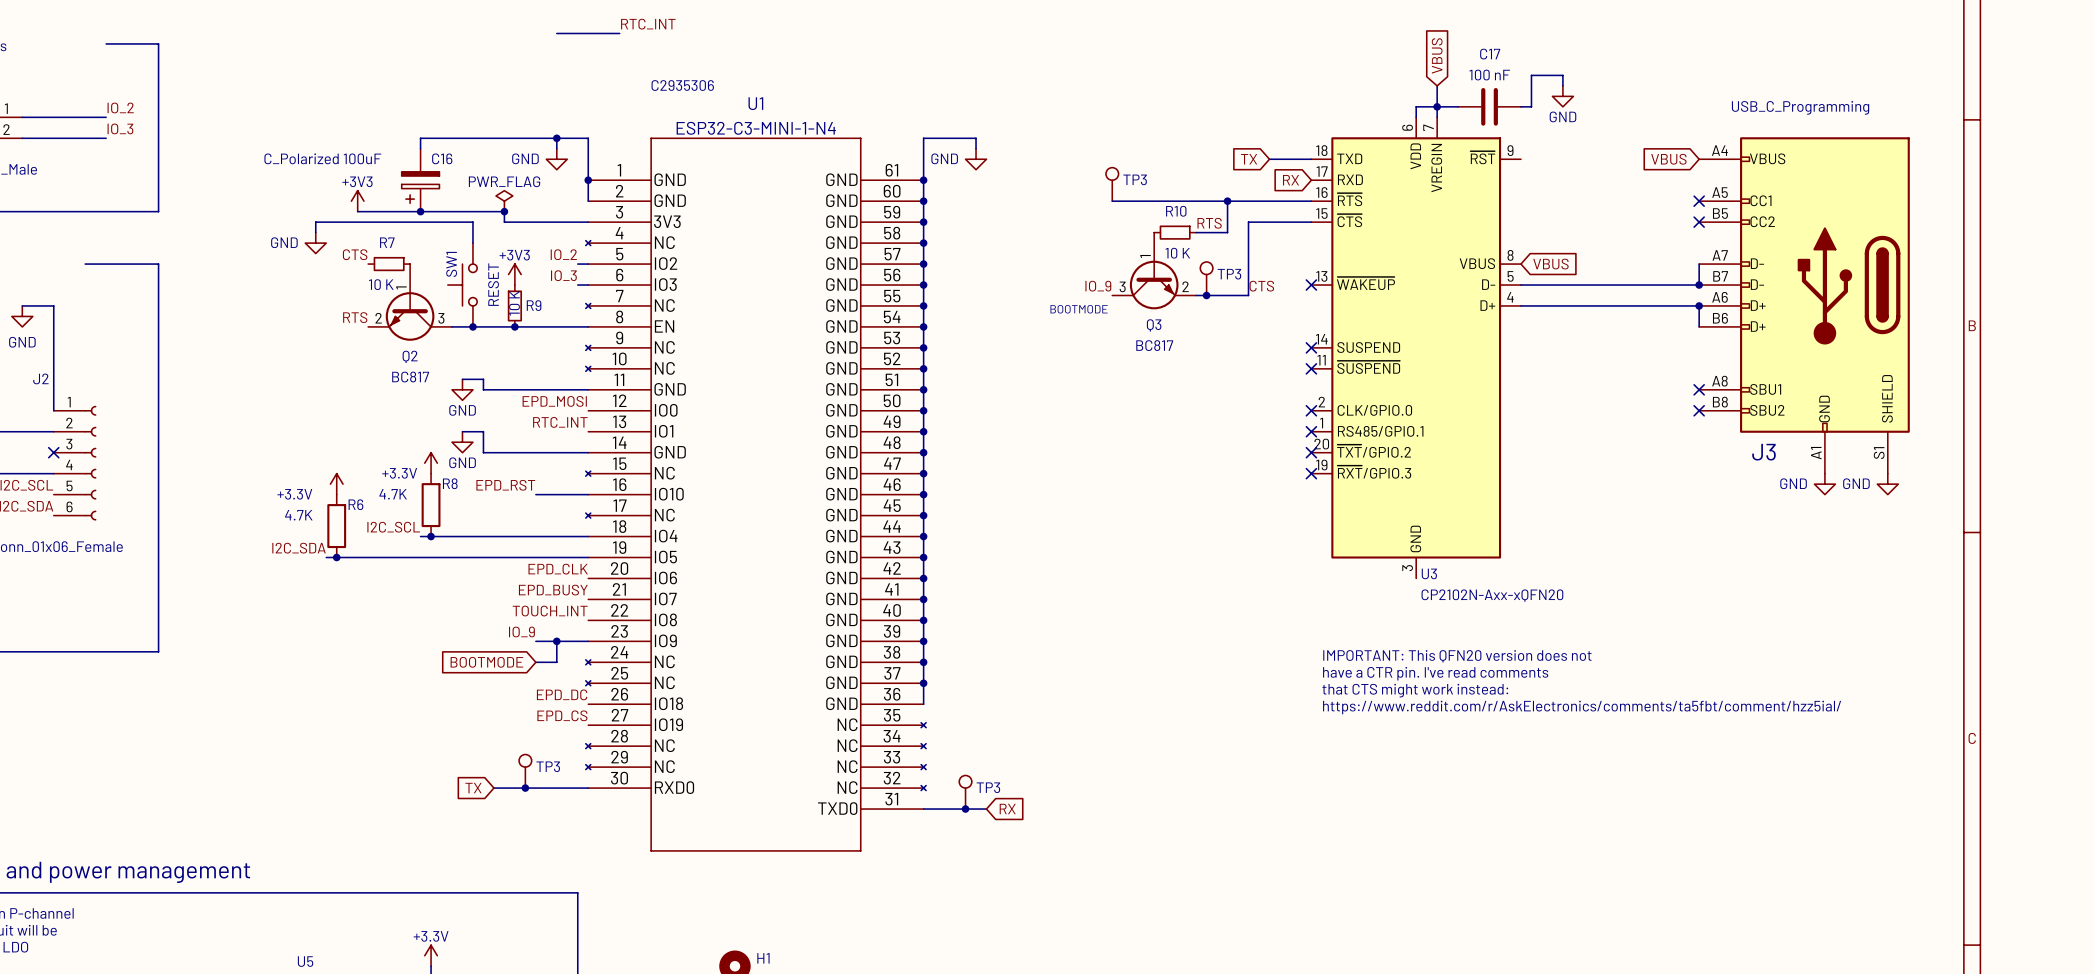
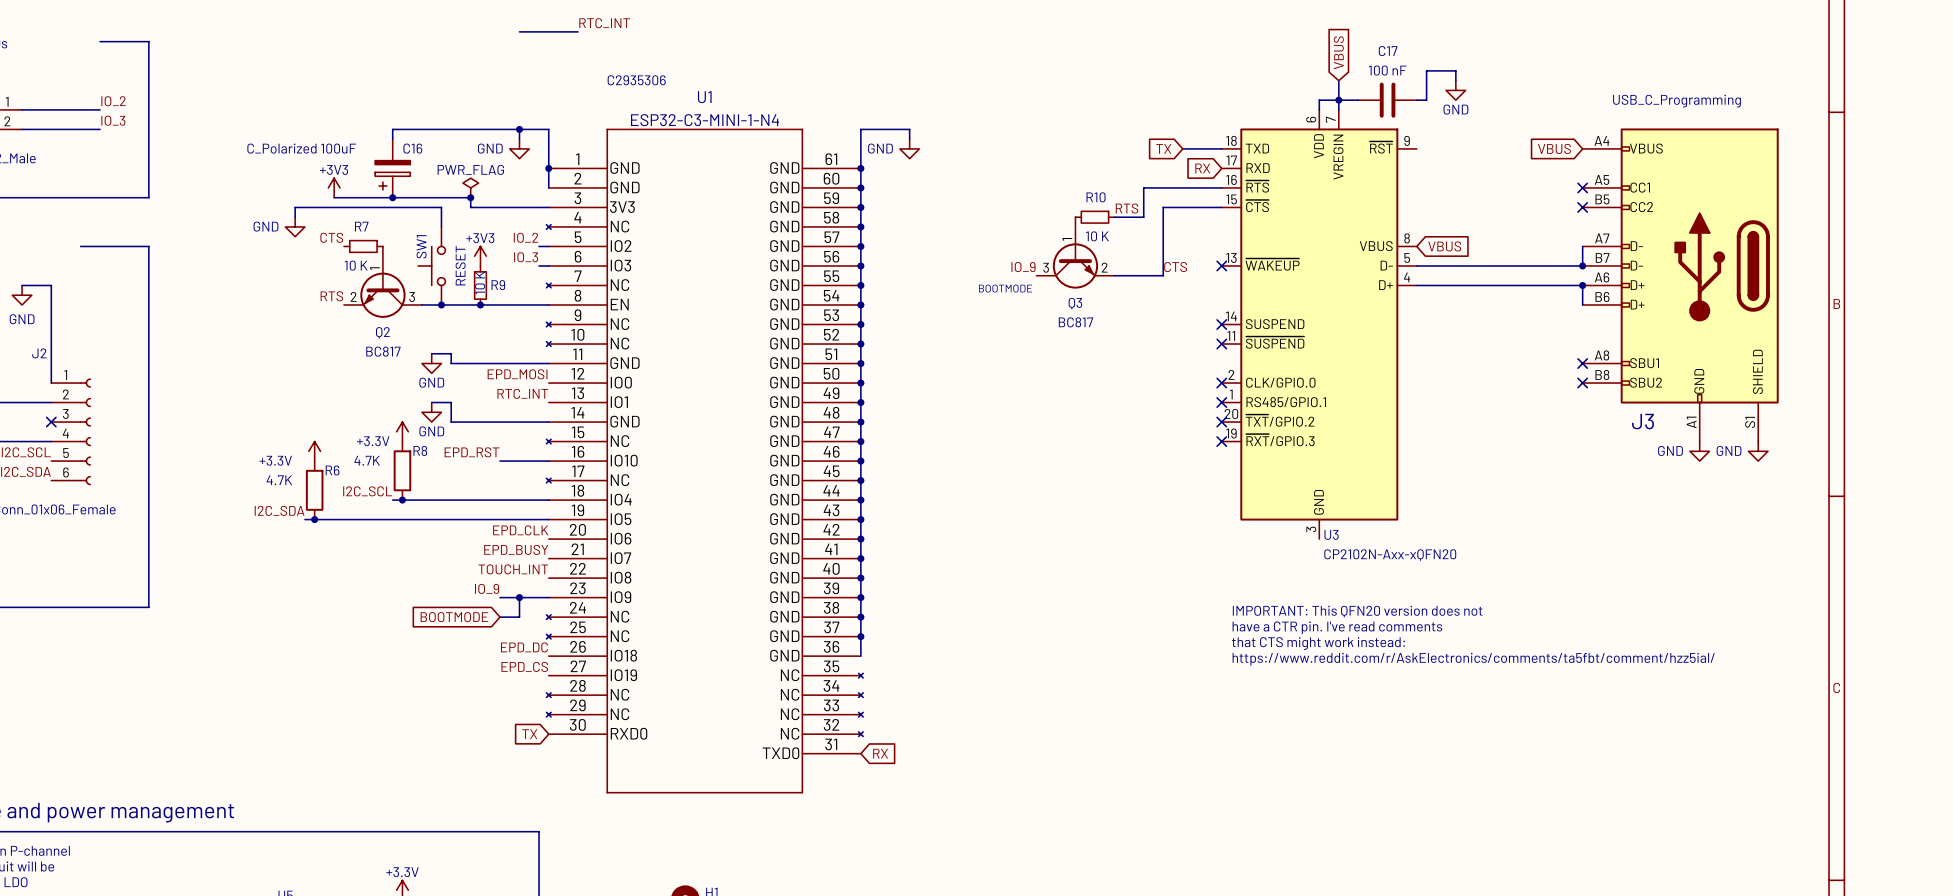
TP3: (1112, 184) -> none
wire: (1112, 201) (1227, 201) -> none
junction: (1227, 201) -> none
TP3: (1206, 278) -> none
junction: (1206, 295) -> none
TP3: (525, 771) -> none
global label position: TX (473, 788) -> TX (529, 734)
wire: (493, 788) (588, 788) -> none
junction: (525, 788) -> none
TP3: (965, 792) -> none
wire: (923, 809) (986, 809) -> none
junction: (965, 809) -> none
global label position: RX (1007, 809) -> RX (880, 753)

